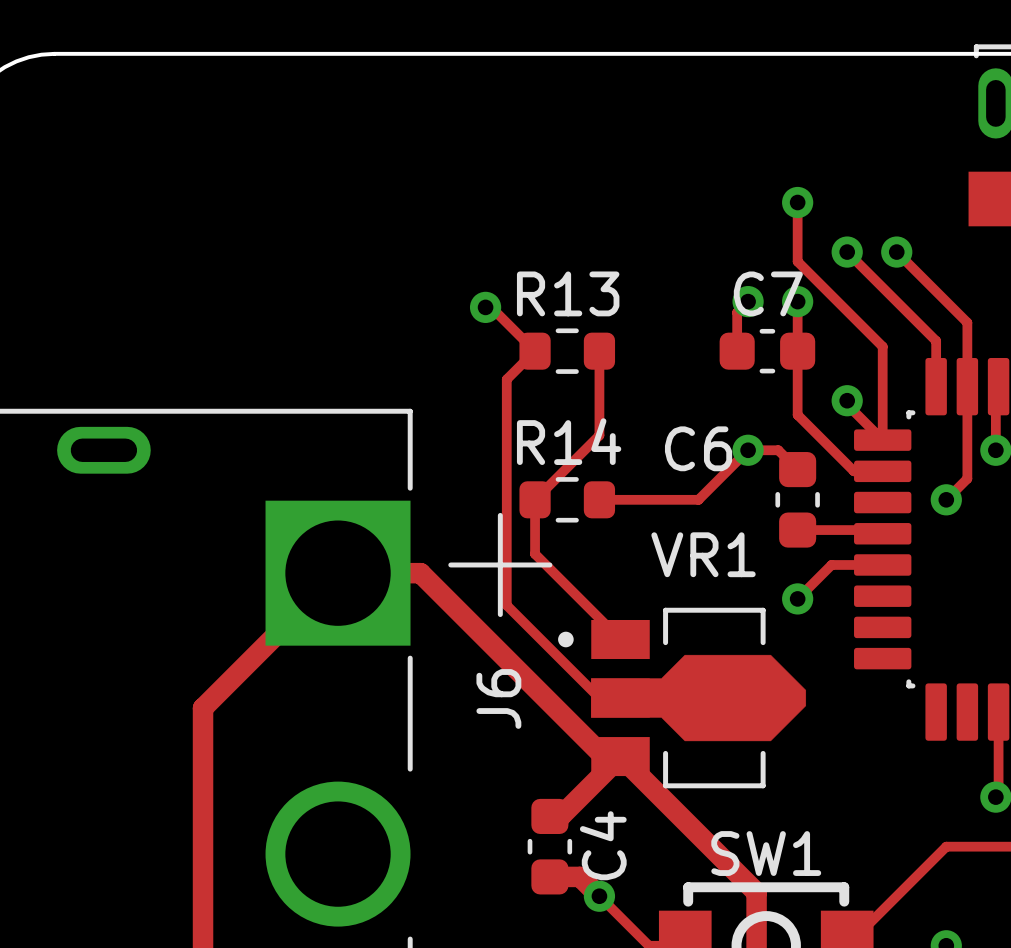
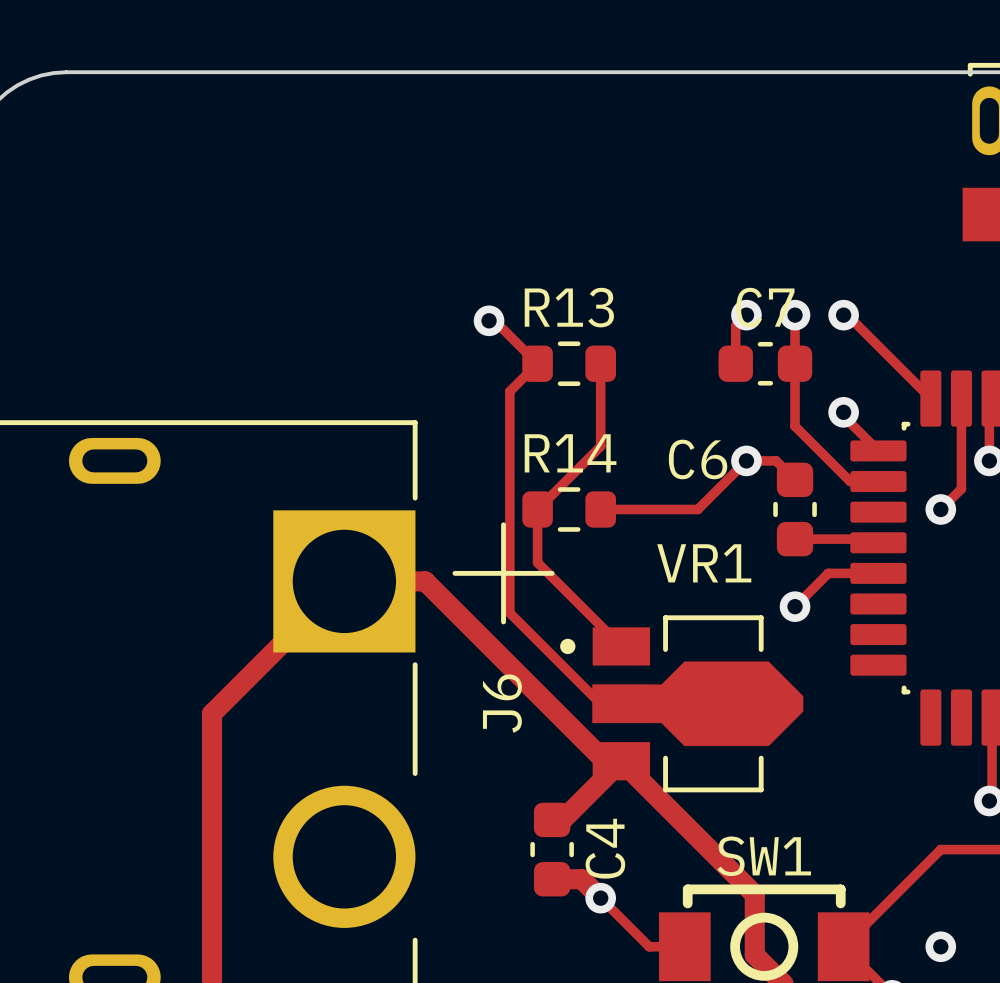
track: (797, 202) (797, 261) (882, 346) (882, 440) -> none
via: (797, 202) -> none
track: (847, 252) (936, 341) (936, 386) -> (843, 315) (847, 315) (930, 398)
via: (847, 252) -> none
track: (896, 252) (967, 322) (967, 386) -> none
via: (896, 252) -> none
via: none -> (843, 315)

